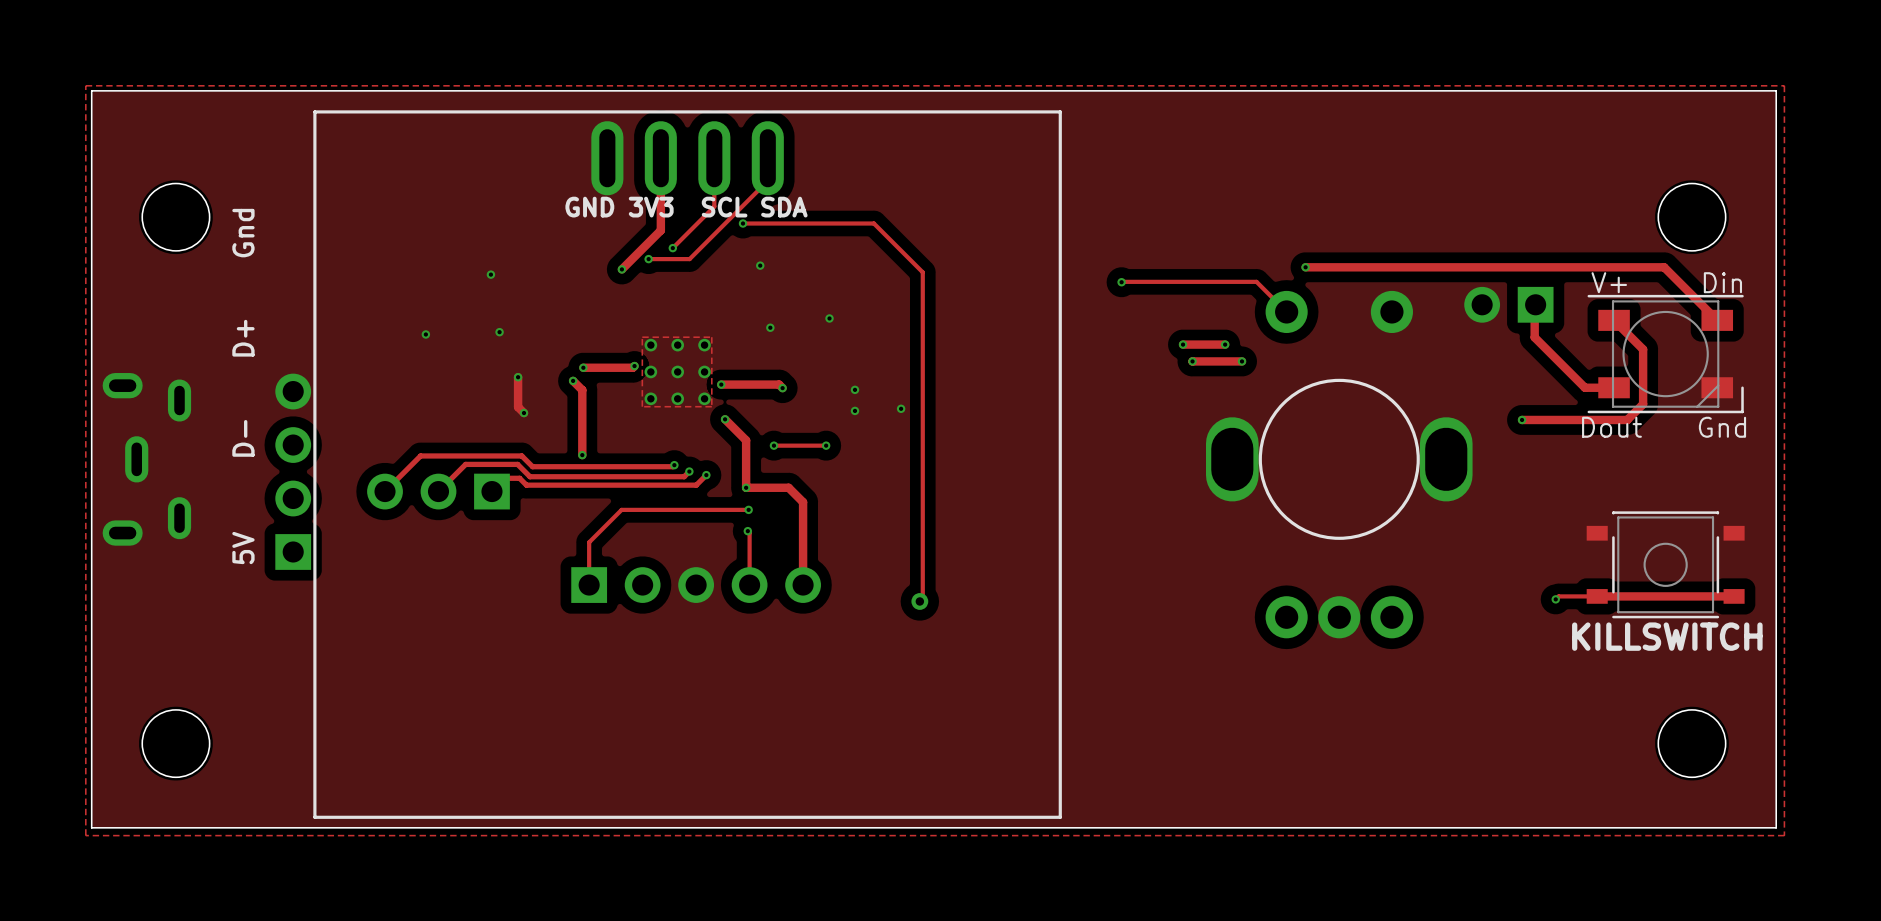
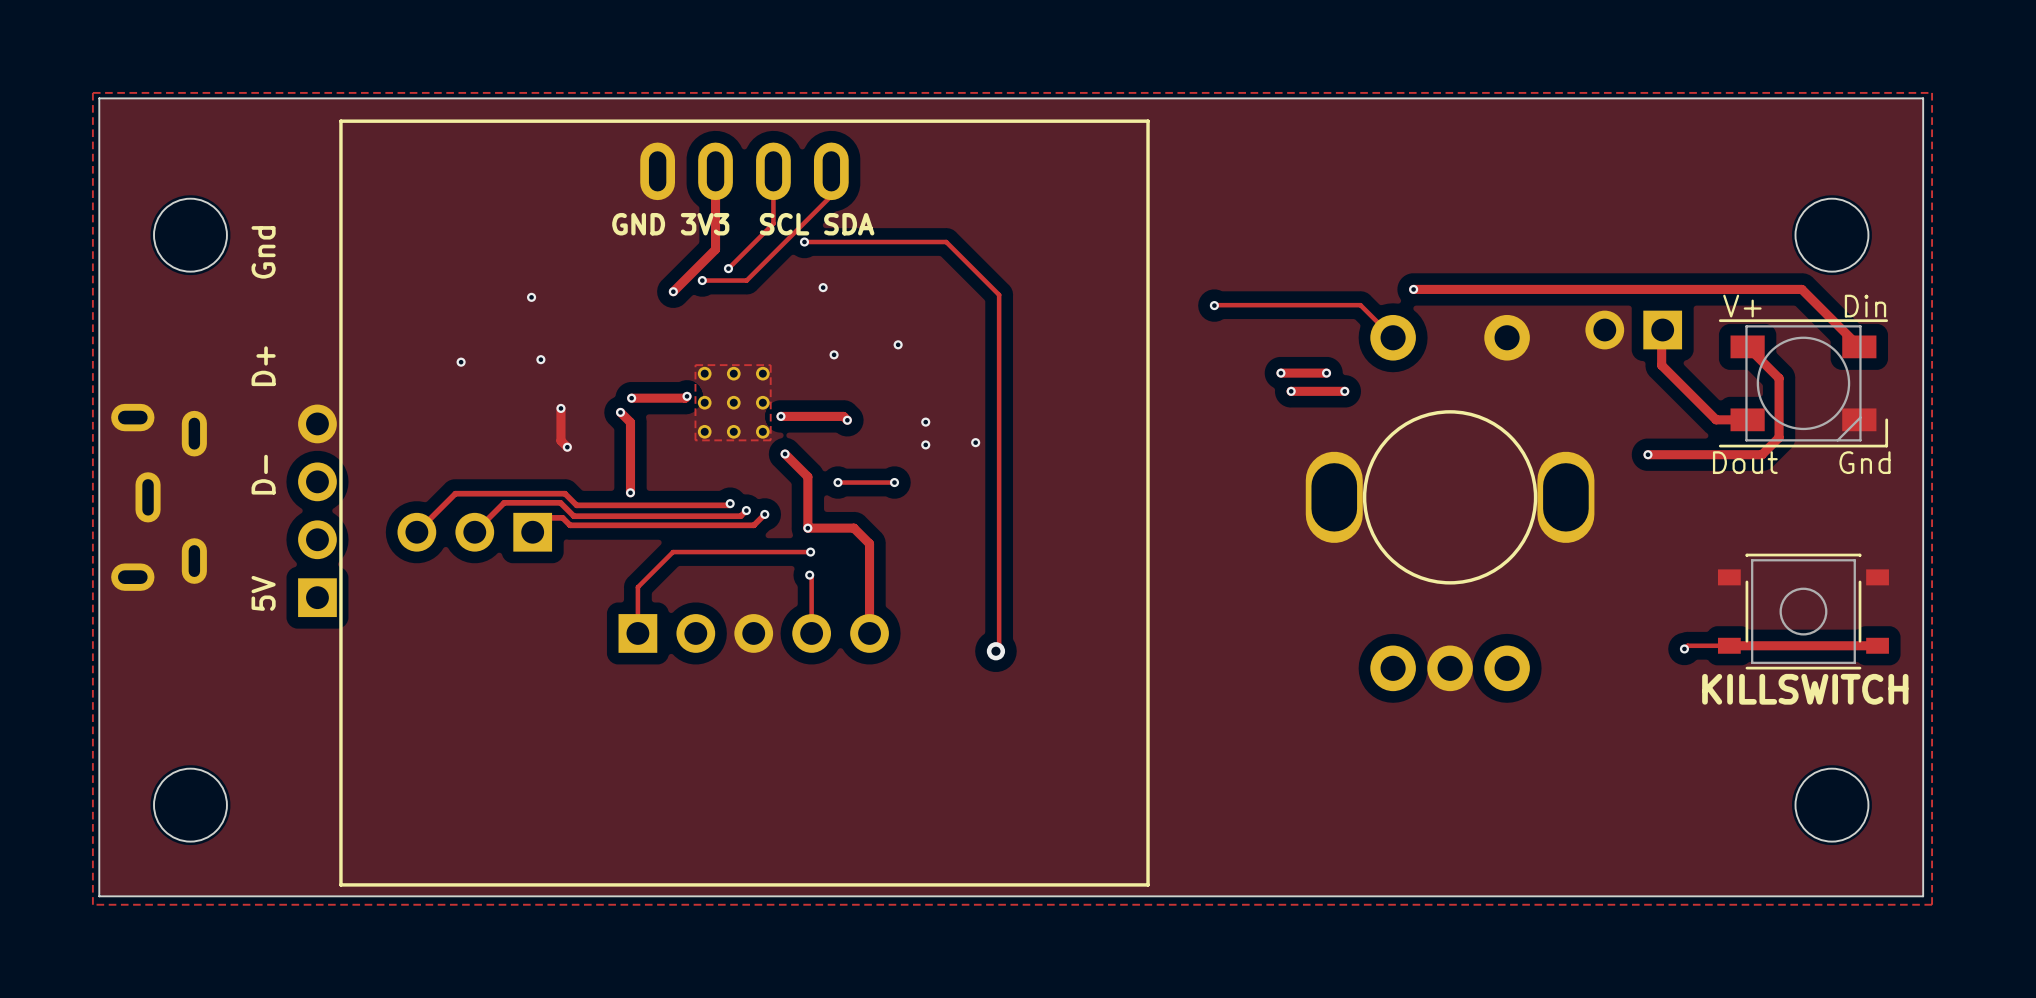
part footprint: [313, 110, 1062, 819] -> [339, 119, 1150, 887]

